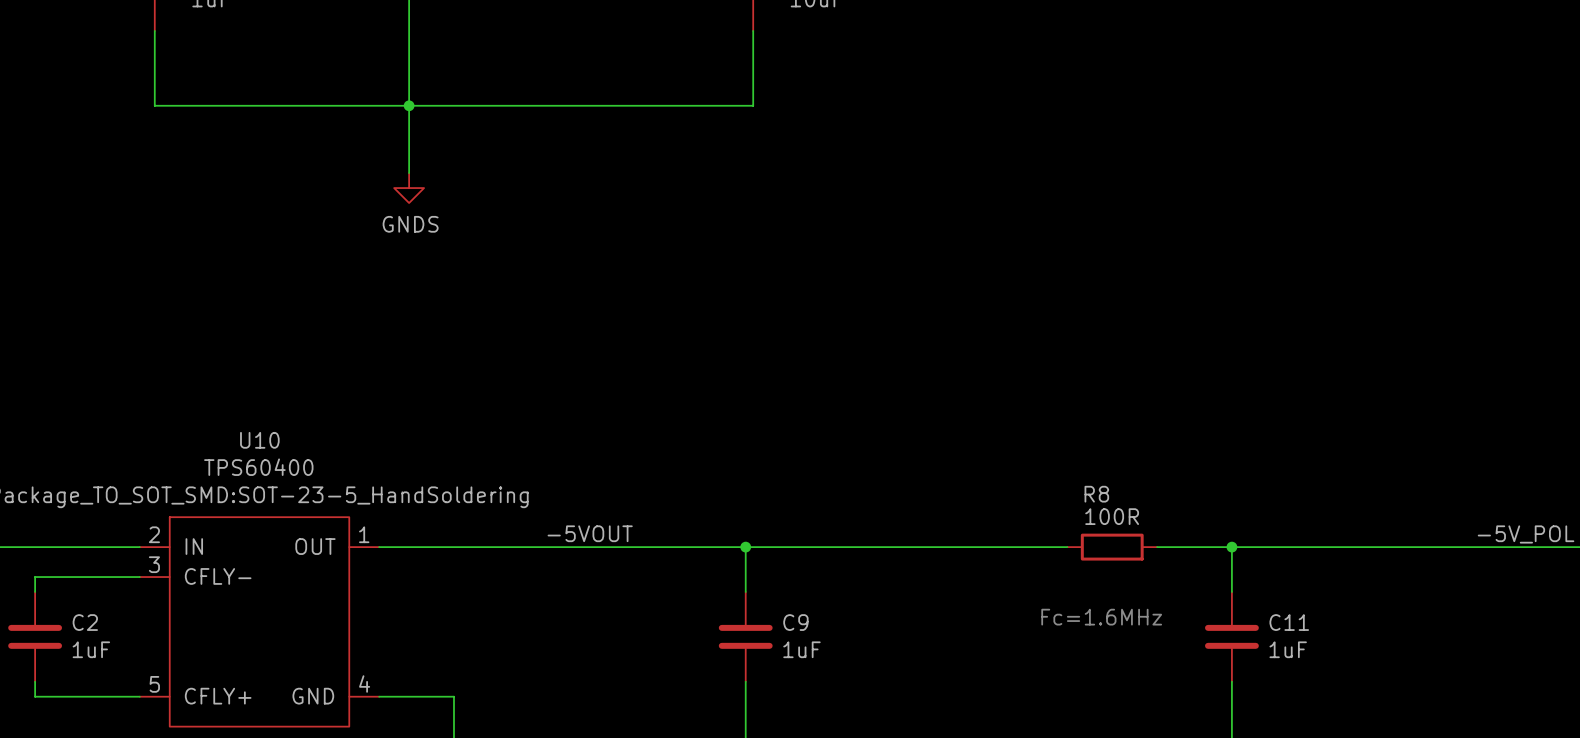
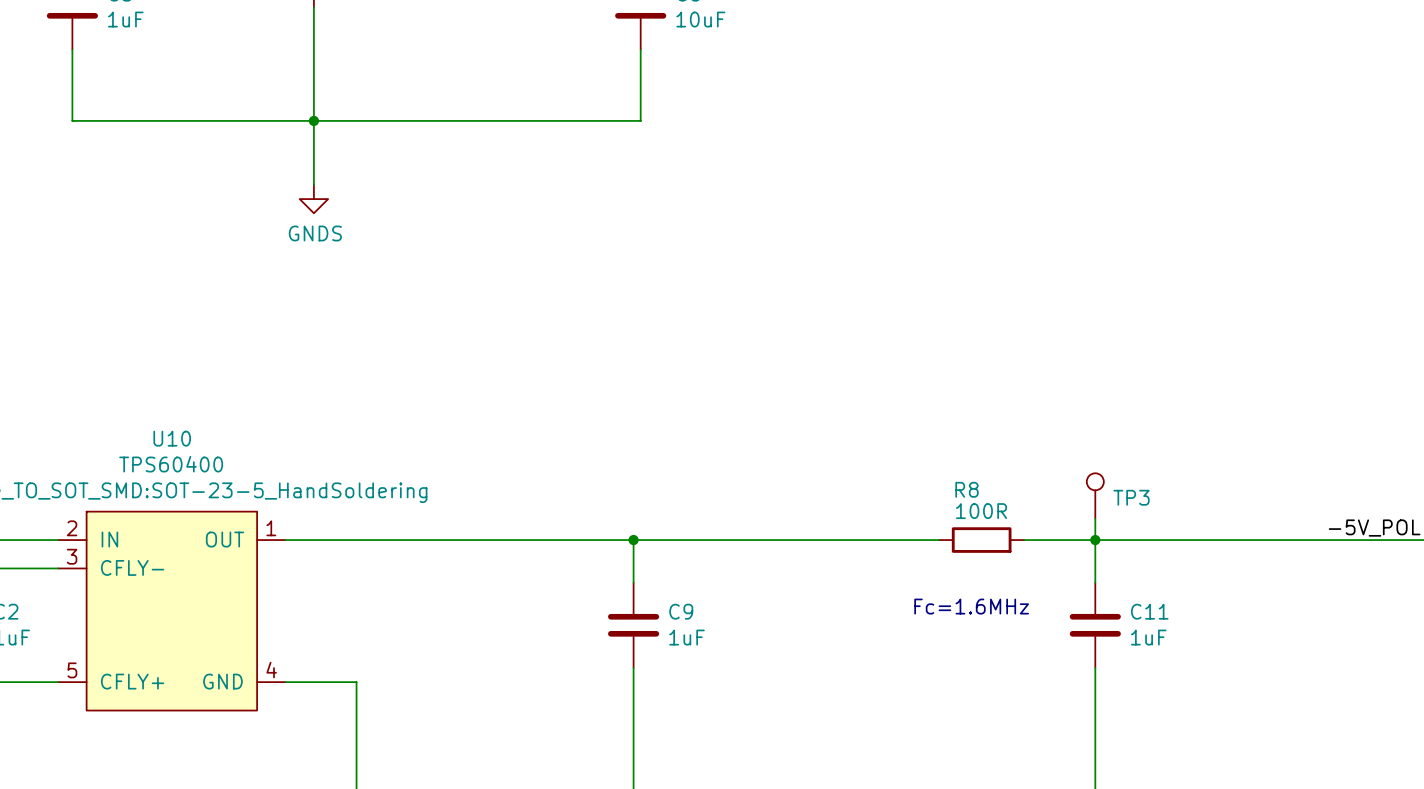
TP3: none -> (1095, 496)
wire: none -> (1095, 518) (1095, 540)
label: -5VOUT (590, 533) -> none

